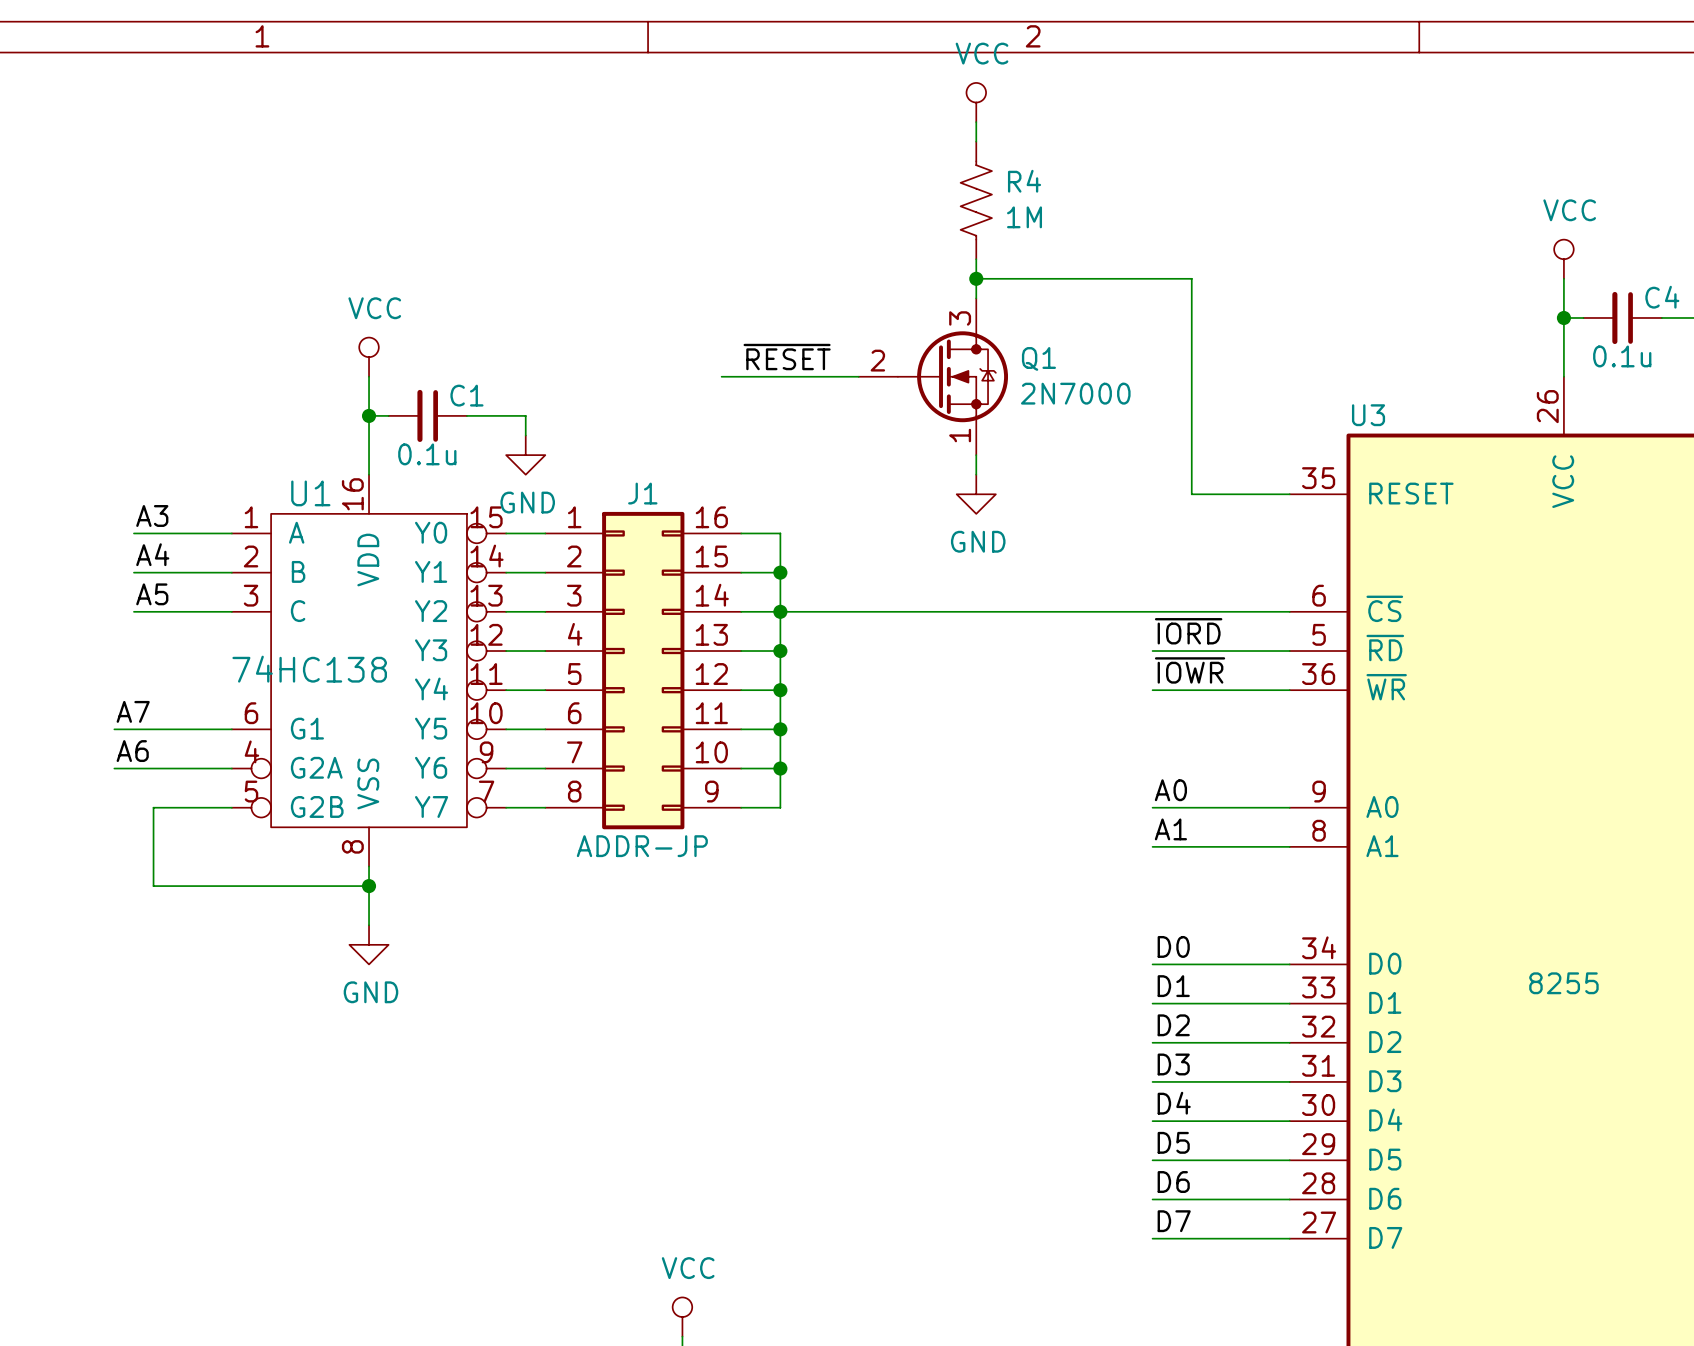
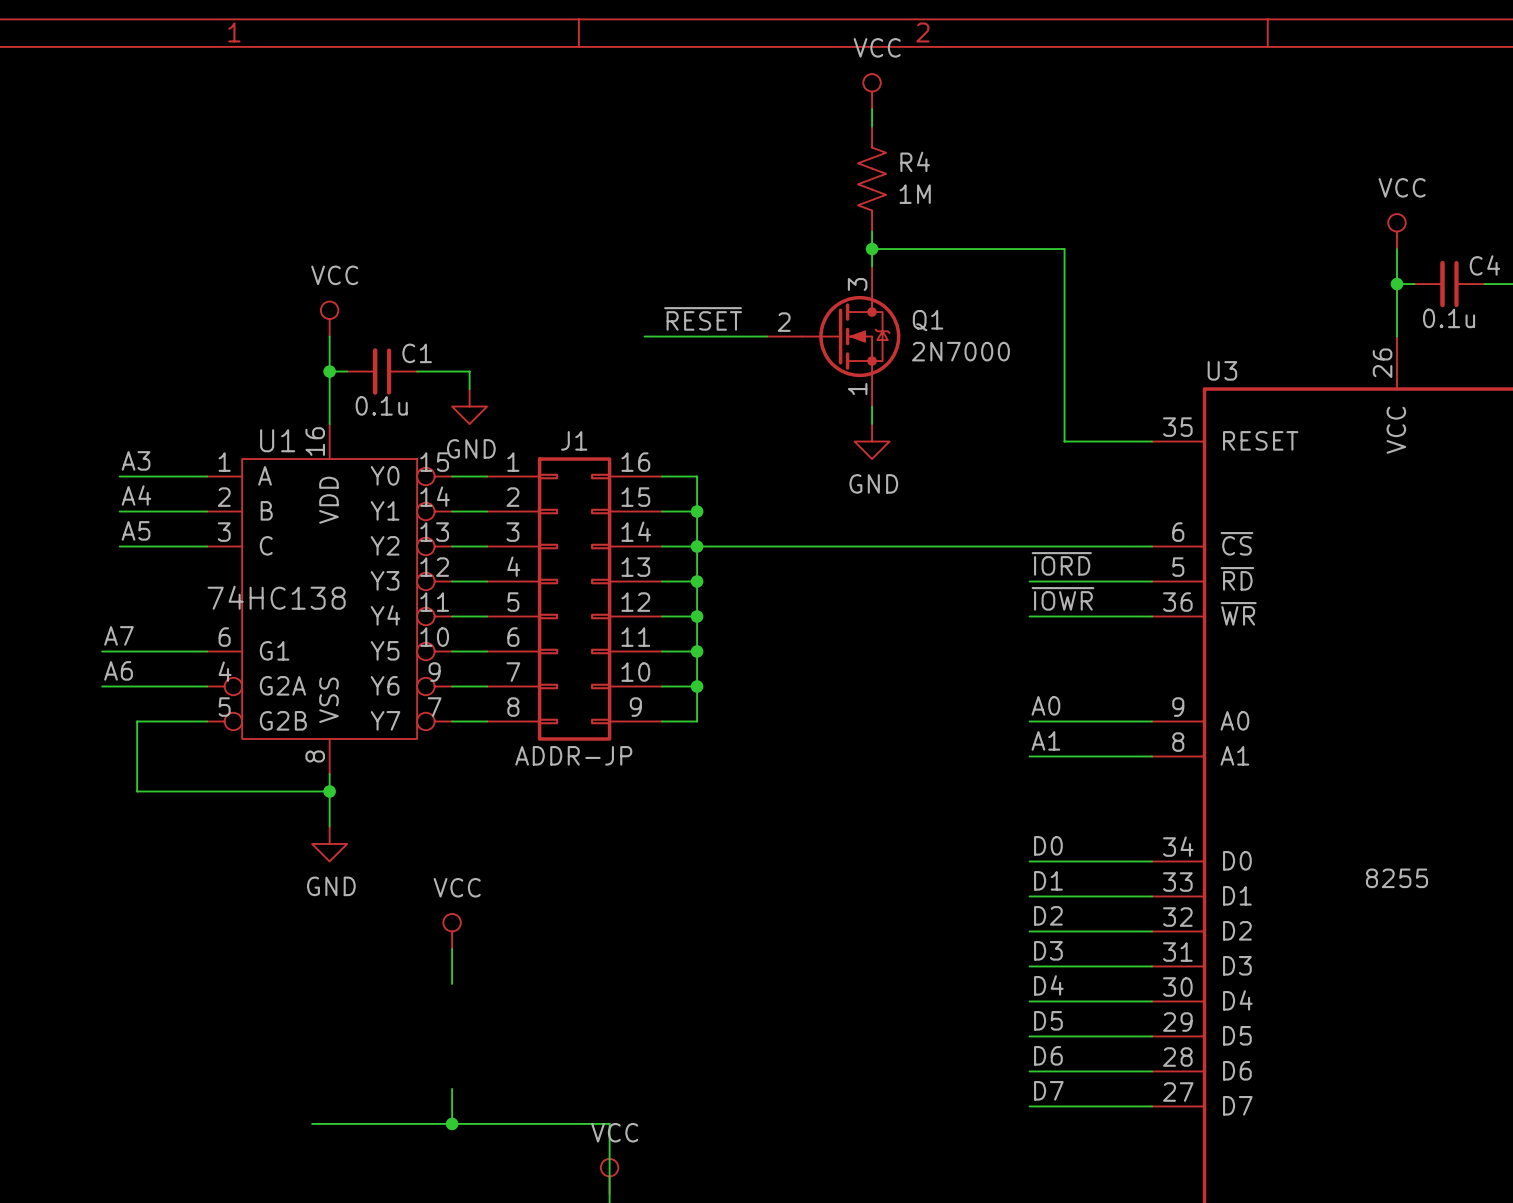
power symbol: none -> VCC (452, 931)
wire: none -> (452, 948) (452, 983)
wire: none -> (452, 1088) (452, 1123)
wire: none -> (312, 1123) (609, 1123) (609, 1193)
junction: none -> (452, 1123)

